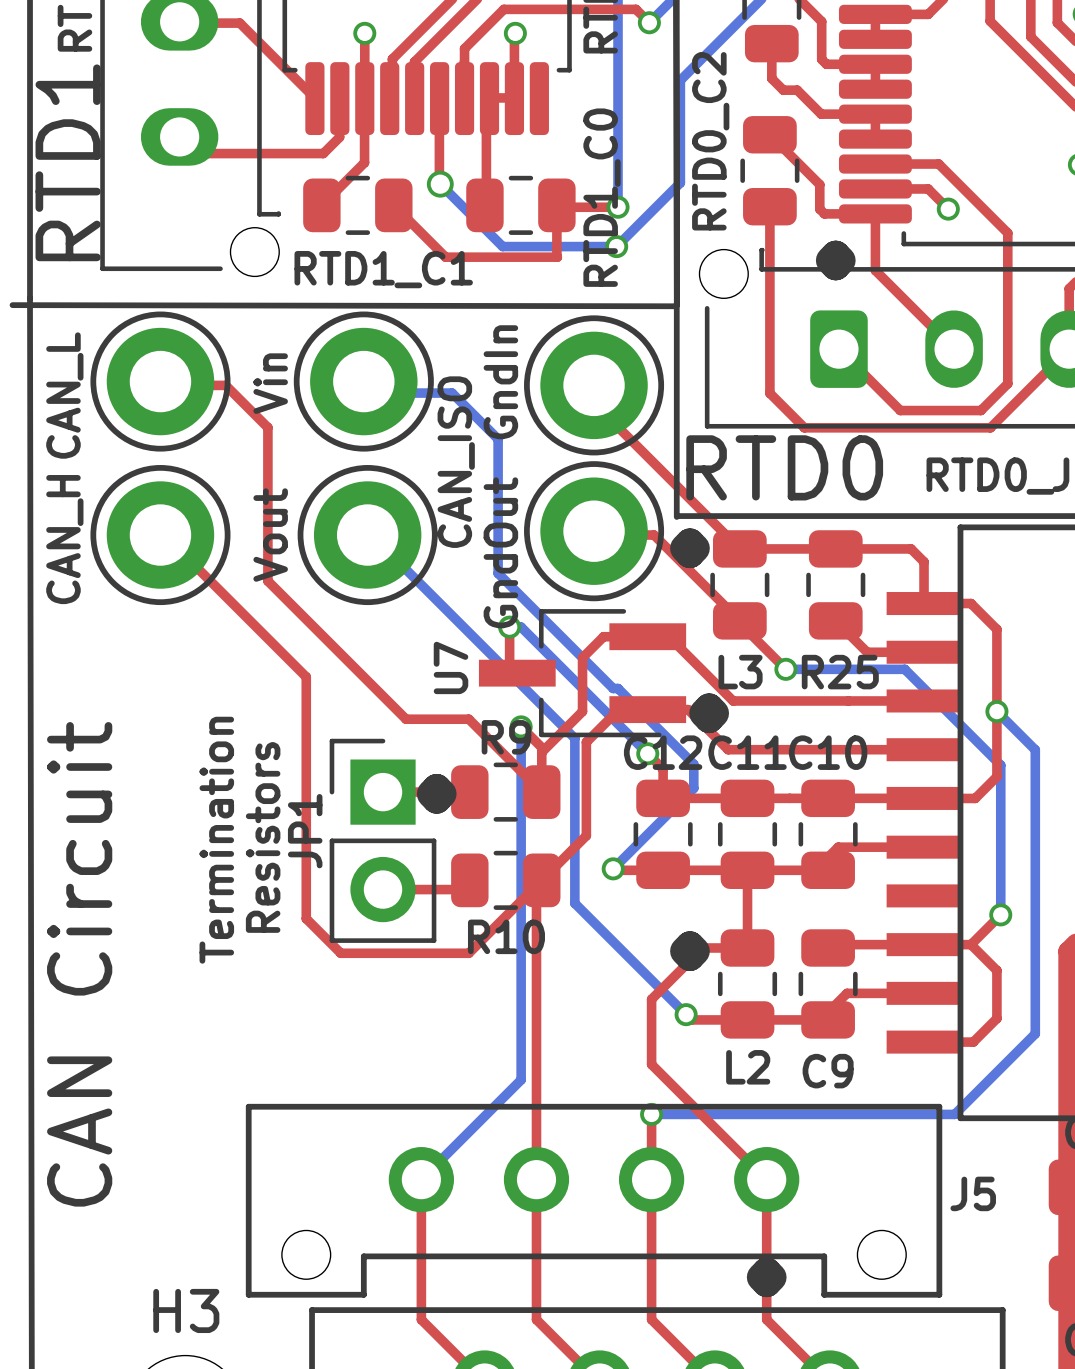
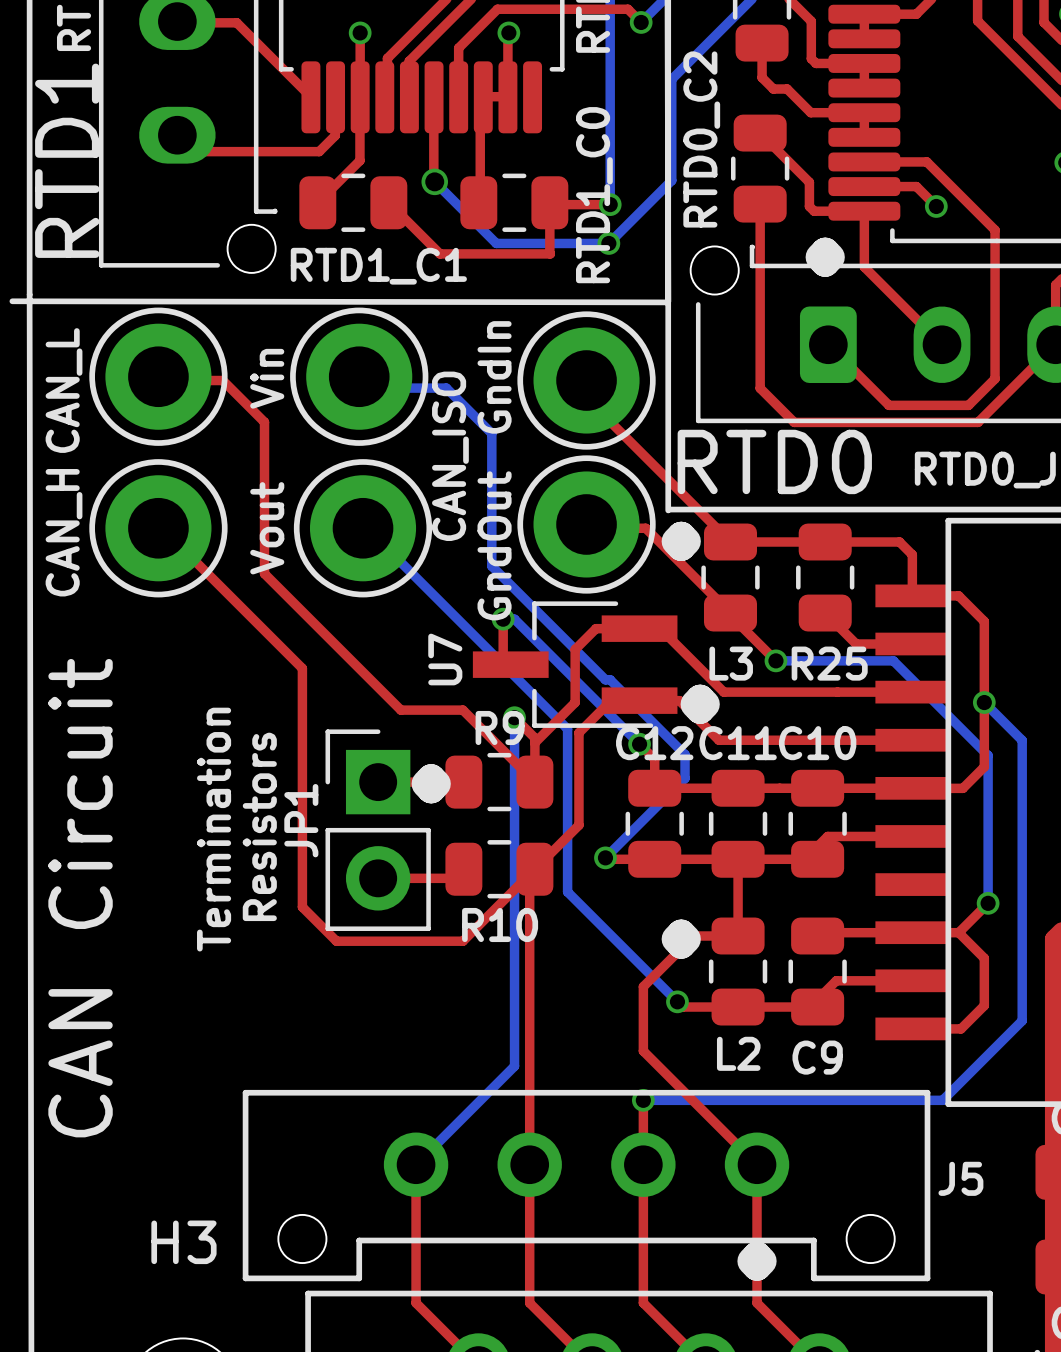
text position: CAN Circuit (79, 964) -> CAN Circuit (80, 898)
H3 name position: H3 (186, 1310) -> H3 (183, 1242)

